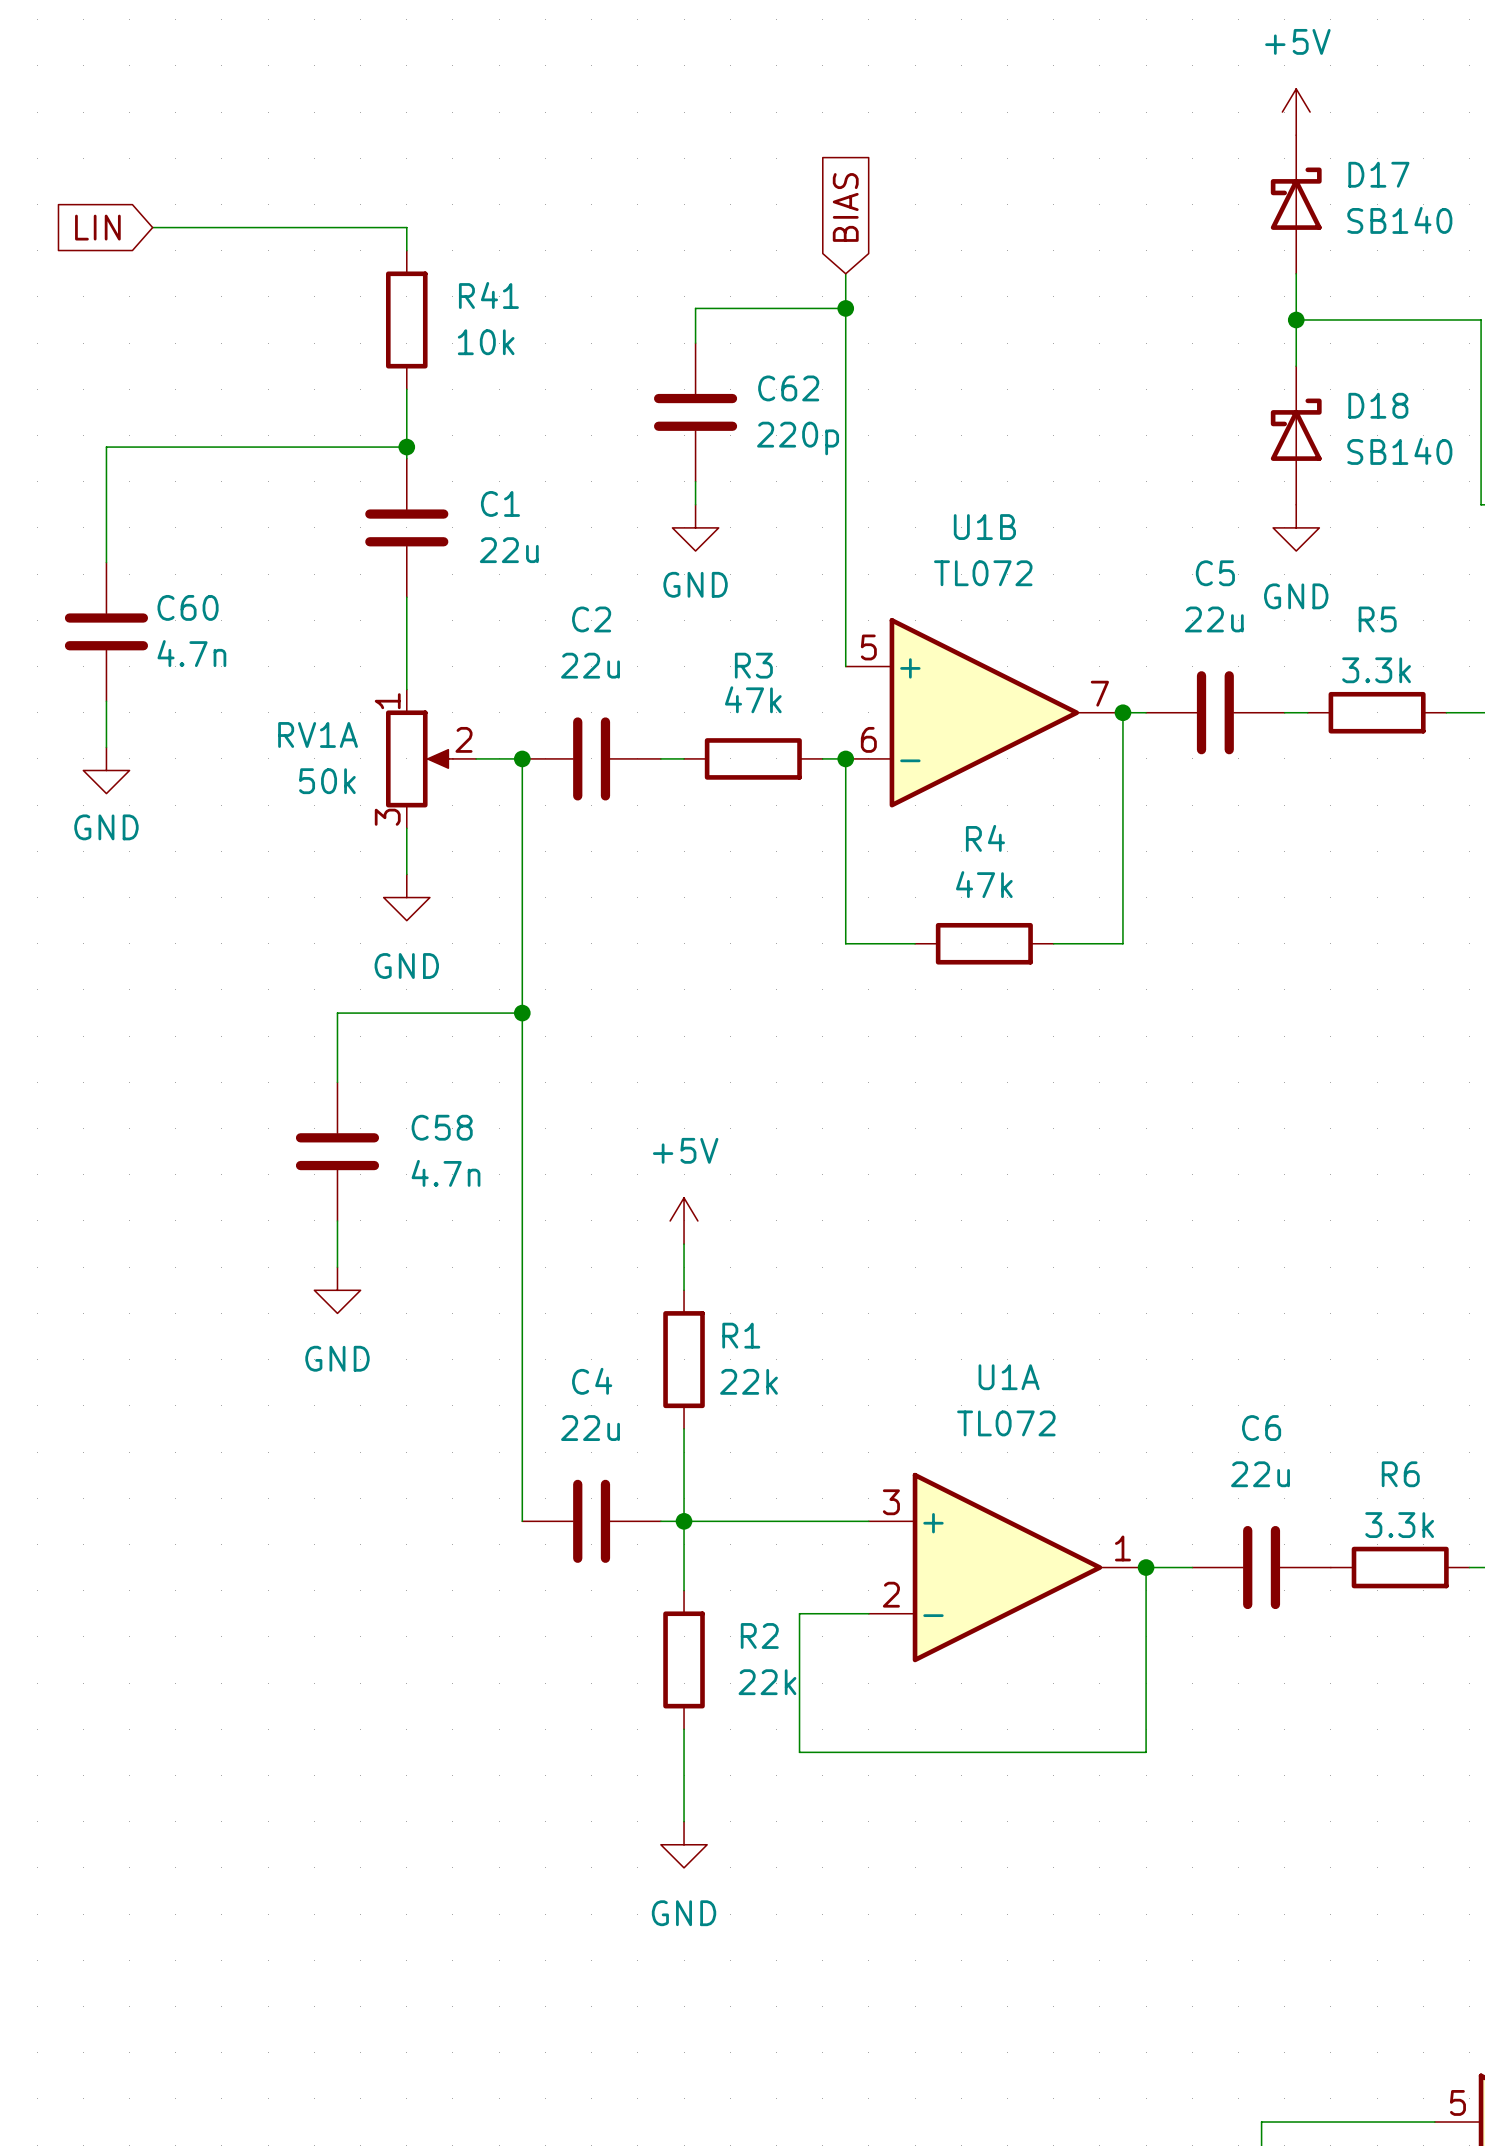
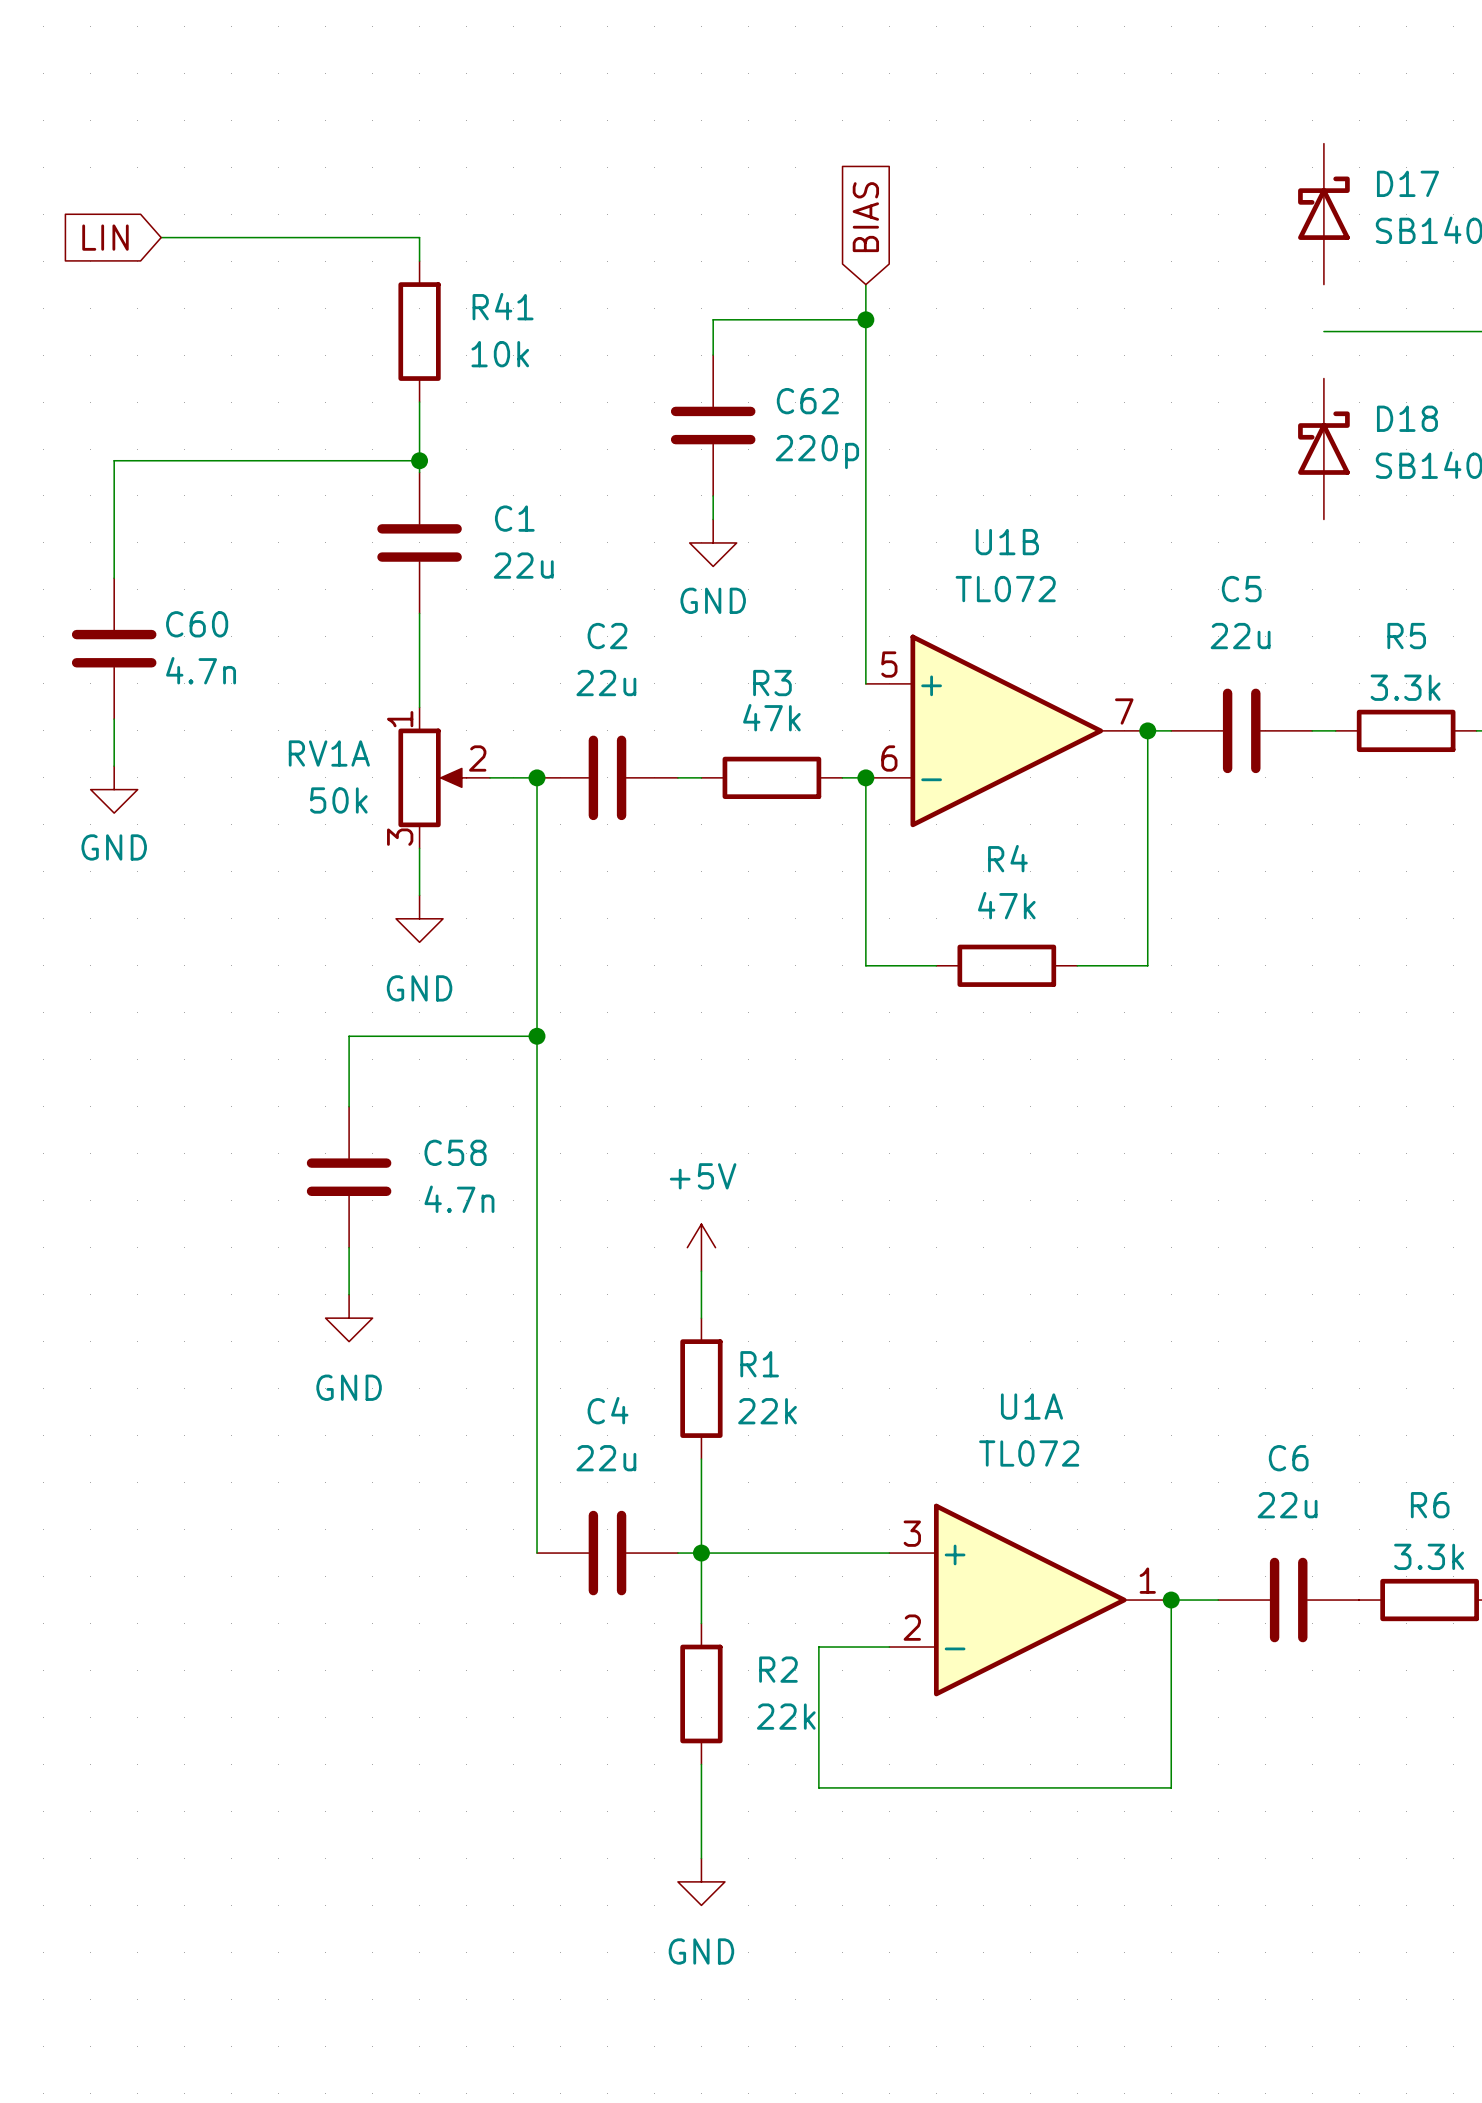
power symbol: +5V (1296, 112) -> none
wire: (1296, 273) (1296, 366) -> none
junction: (1296, 319) -> none
power symbol: GND (1296, 527) -> none

